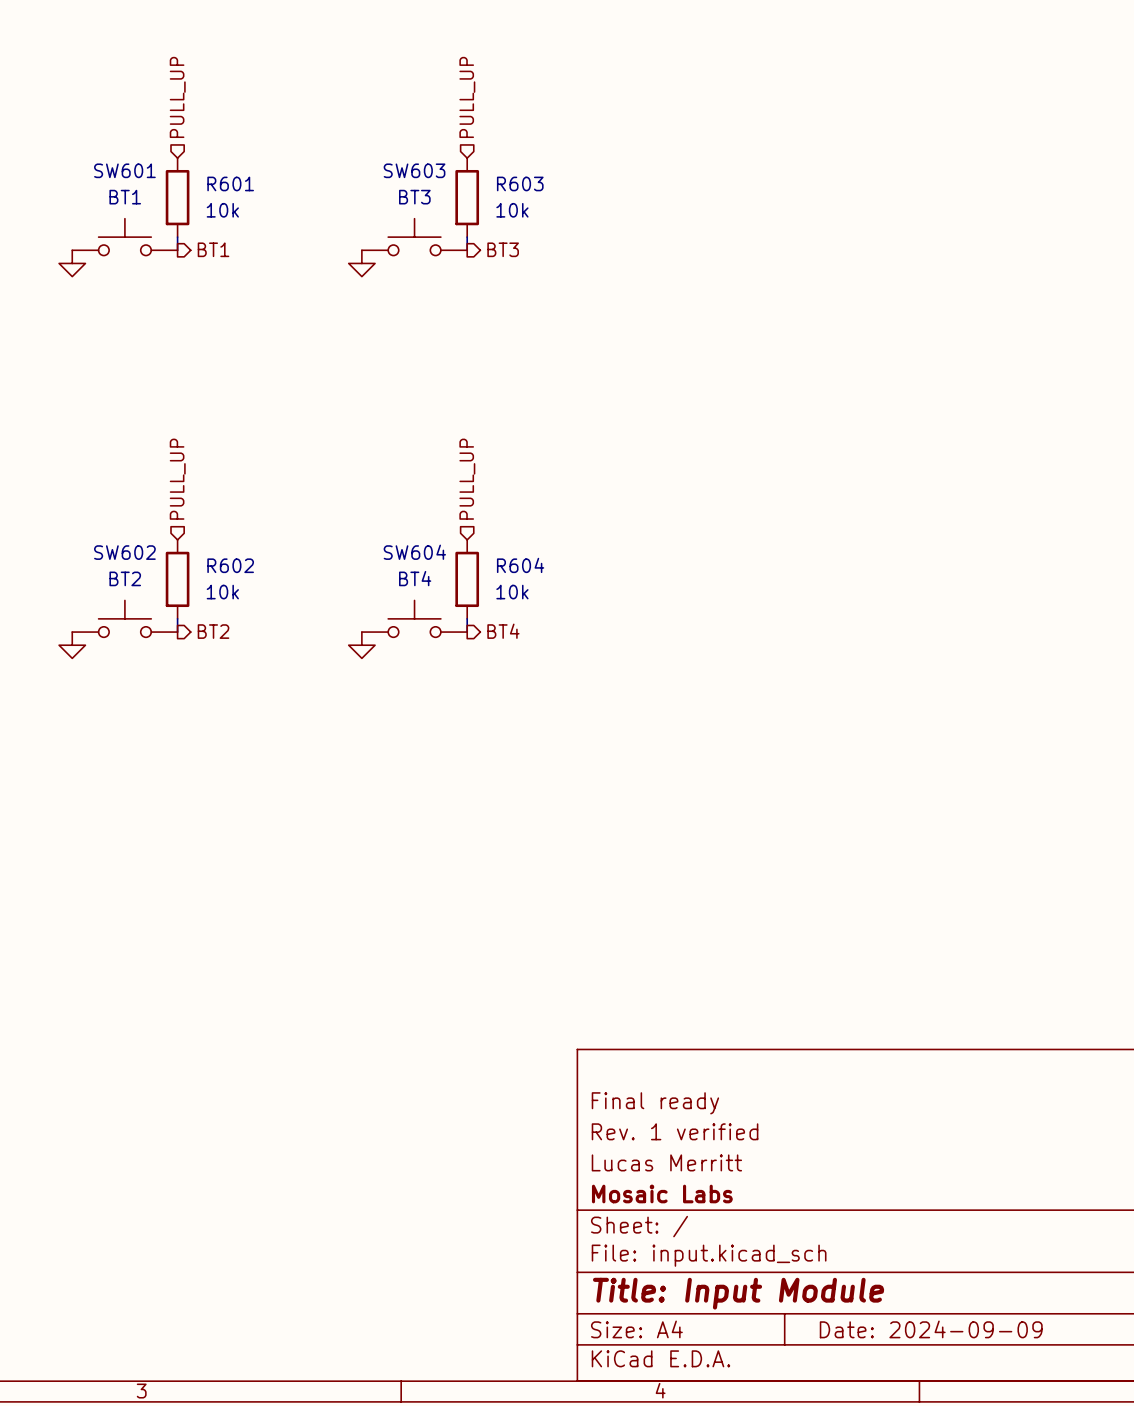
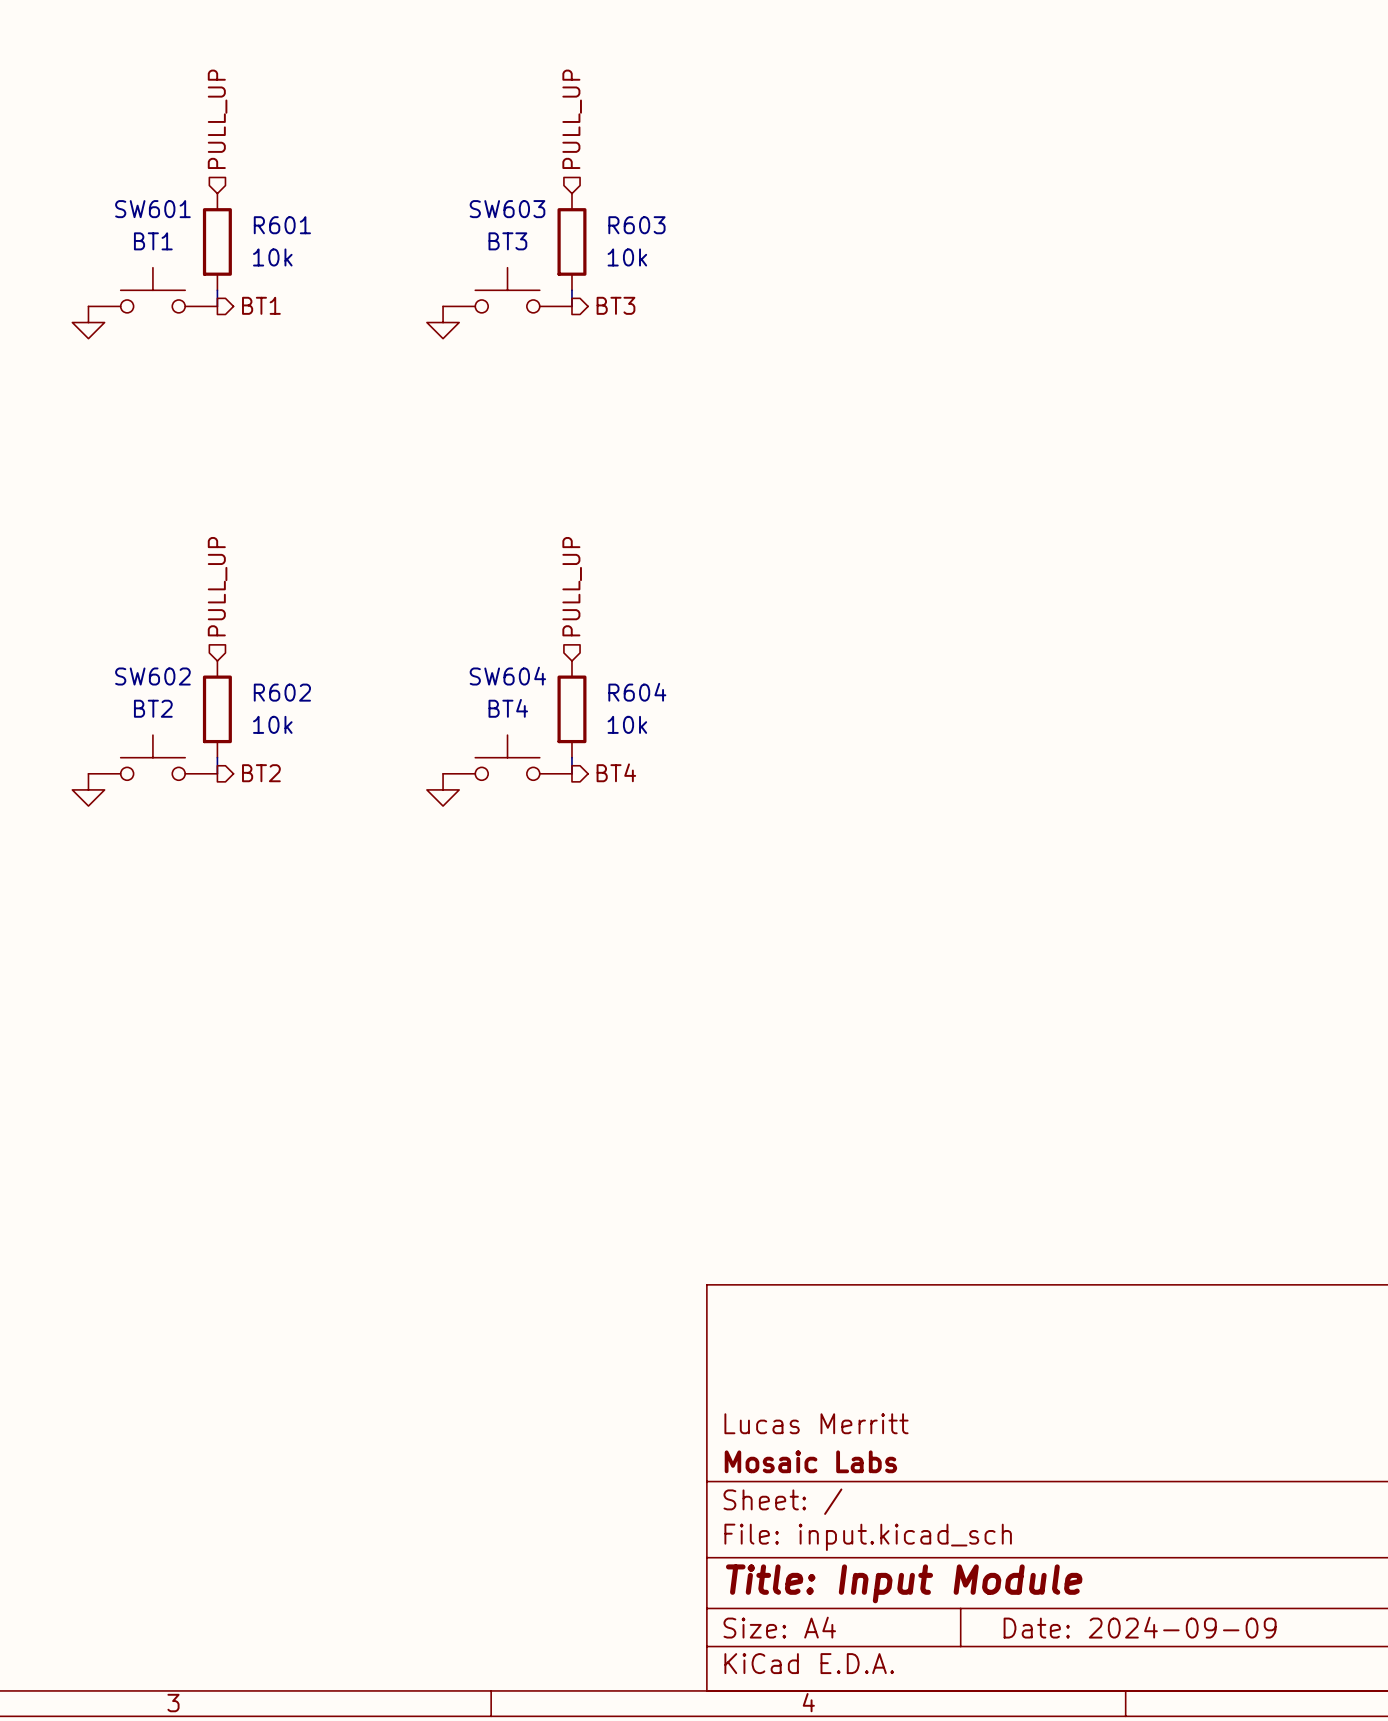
title block: Final ready (655, 1103) -> none
title block: Rev. 1 verified (675, 1131) -> none

